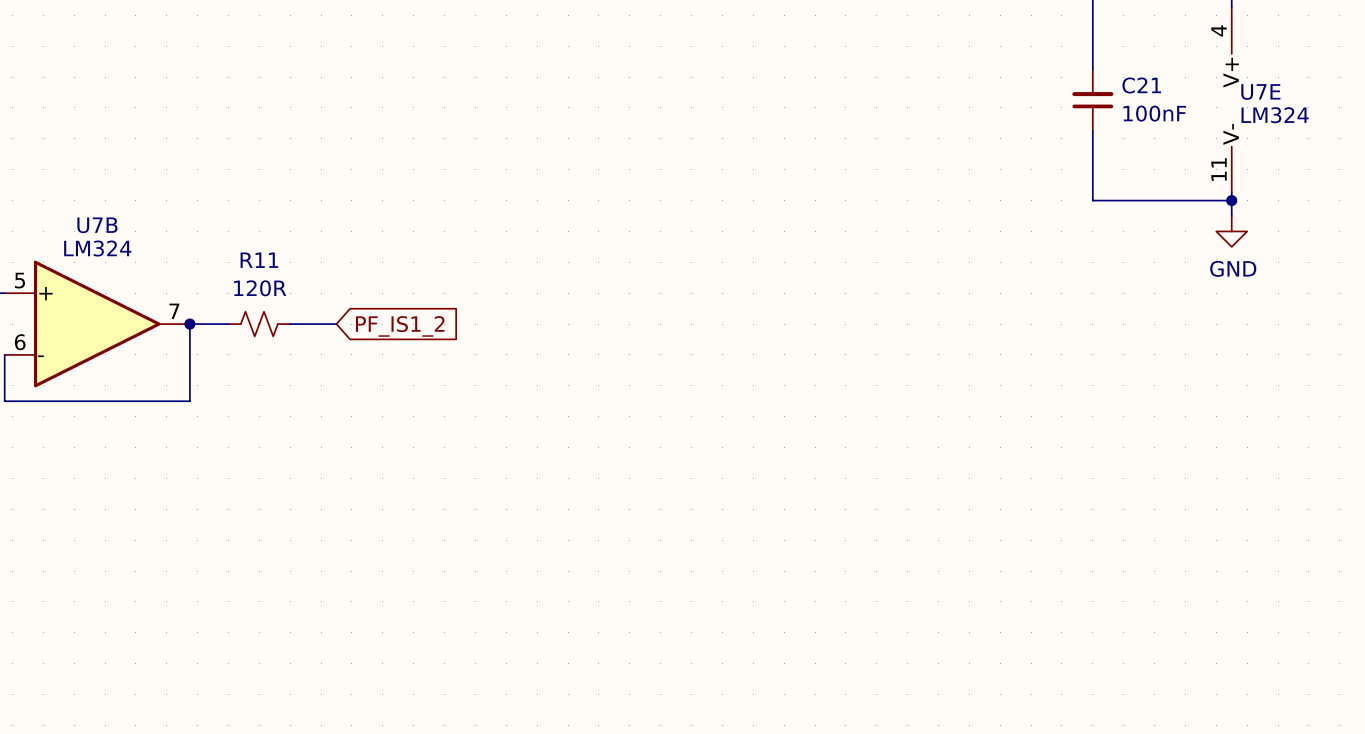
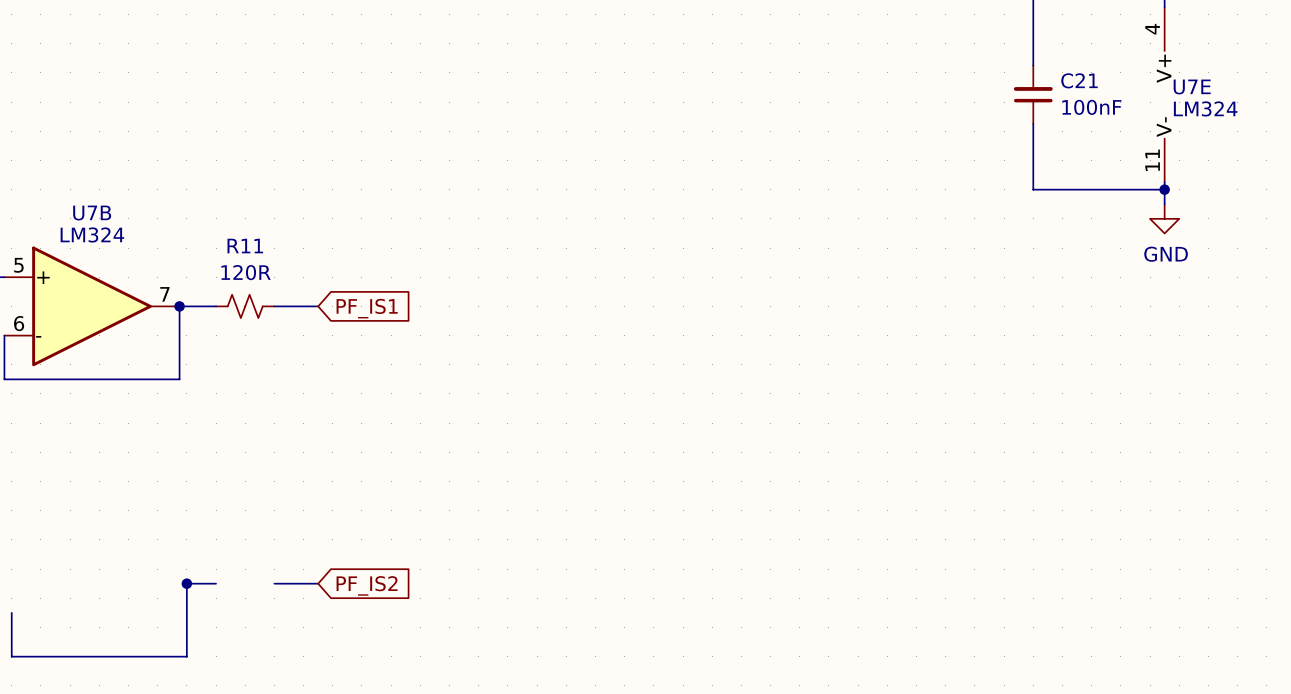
global label: PF_IS1_2 (400, 326) -> PF_IS1 (367, 308)
junction: none -> (186, 583)
wire: none -> (216, 583) (186, 583) (186, 656) (11, 656) (11, 612)
wire: none -> (274, 583) (318, 583)
global label: none -> PF_IS2 (367, 585)

